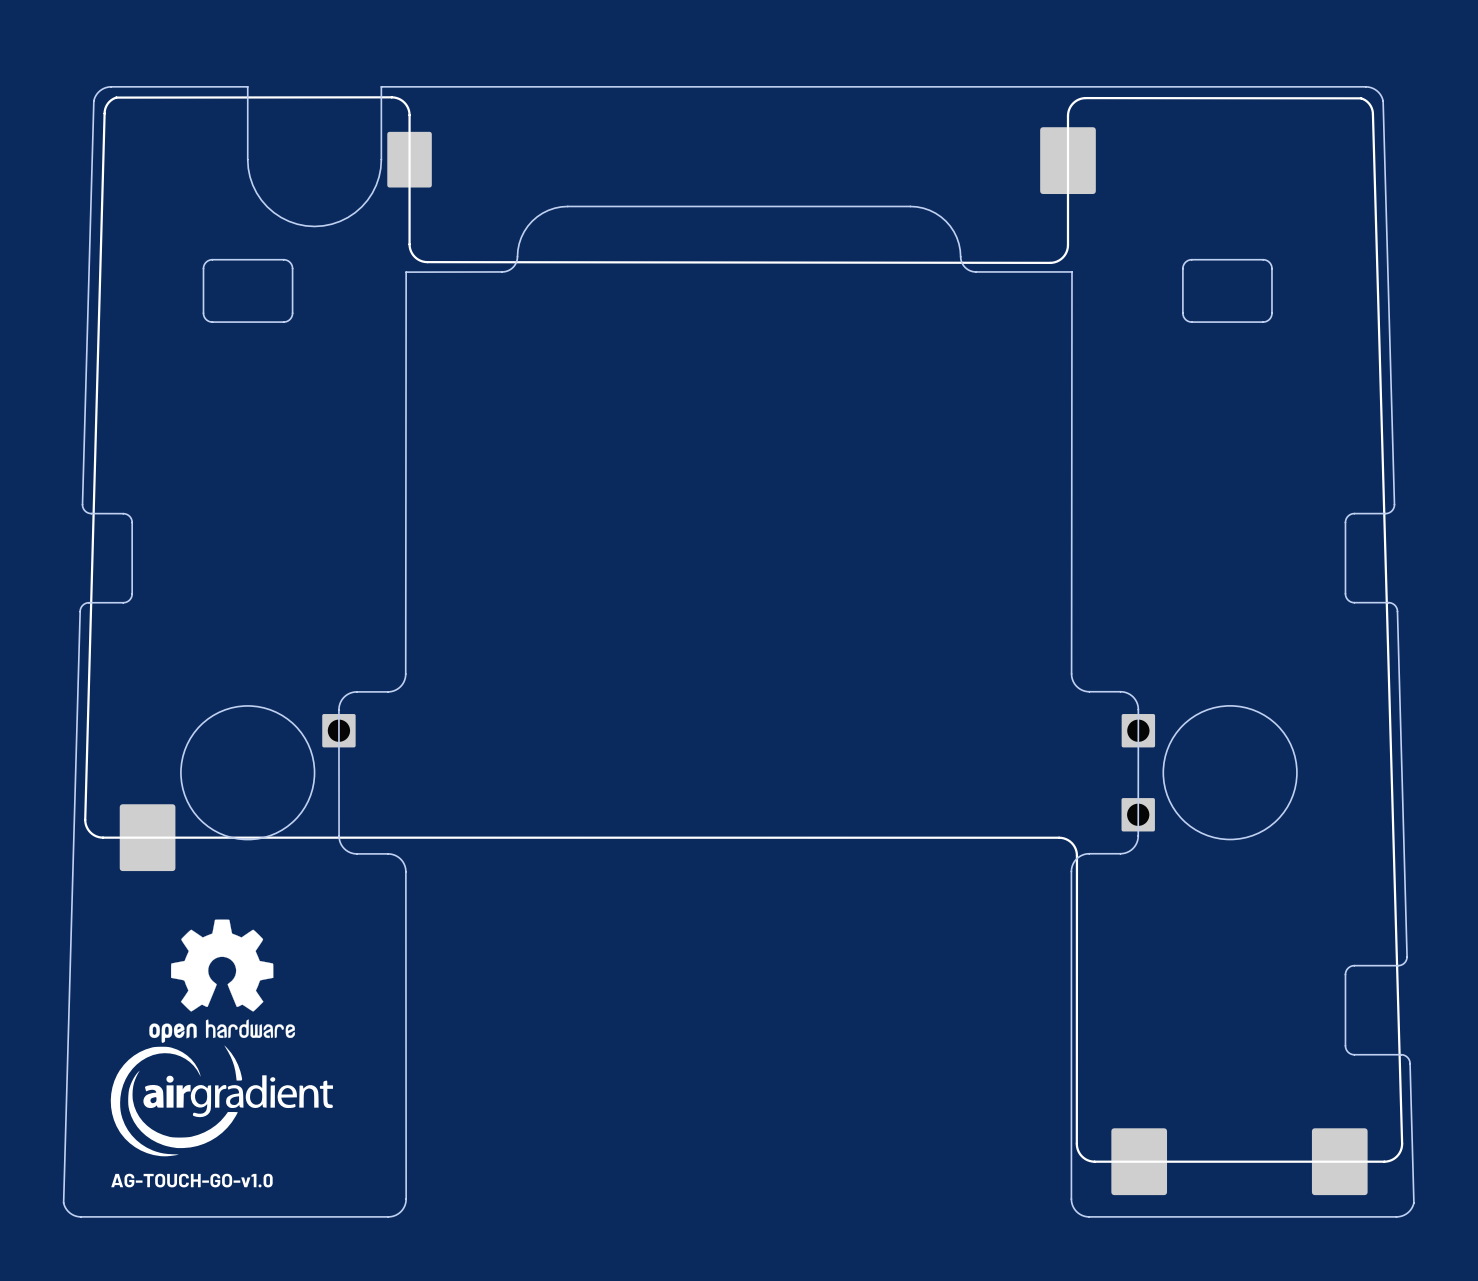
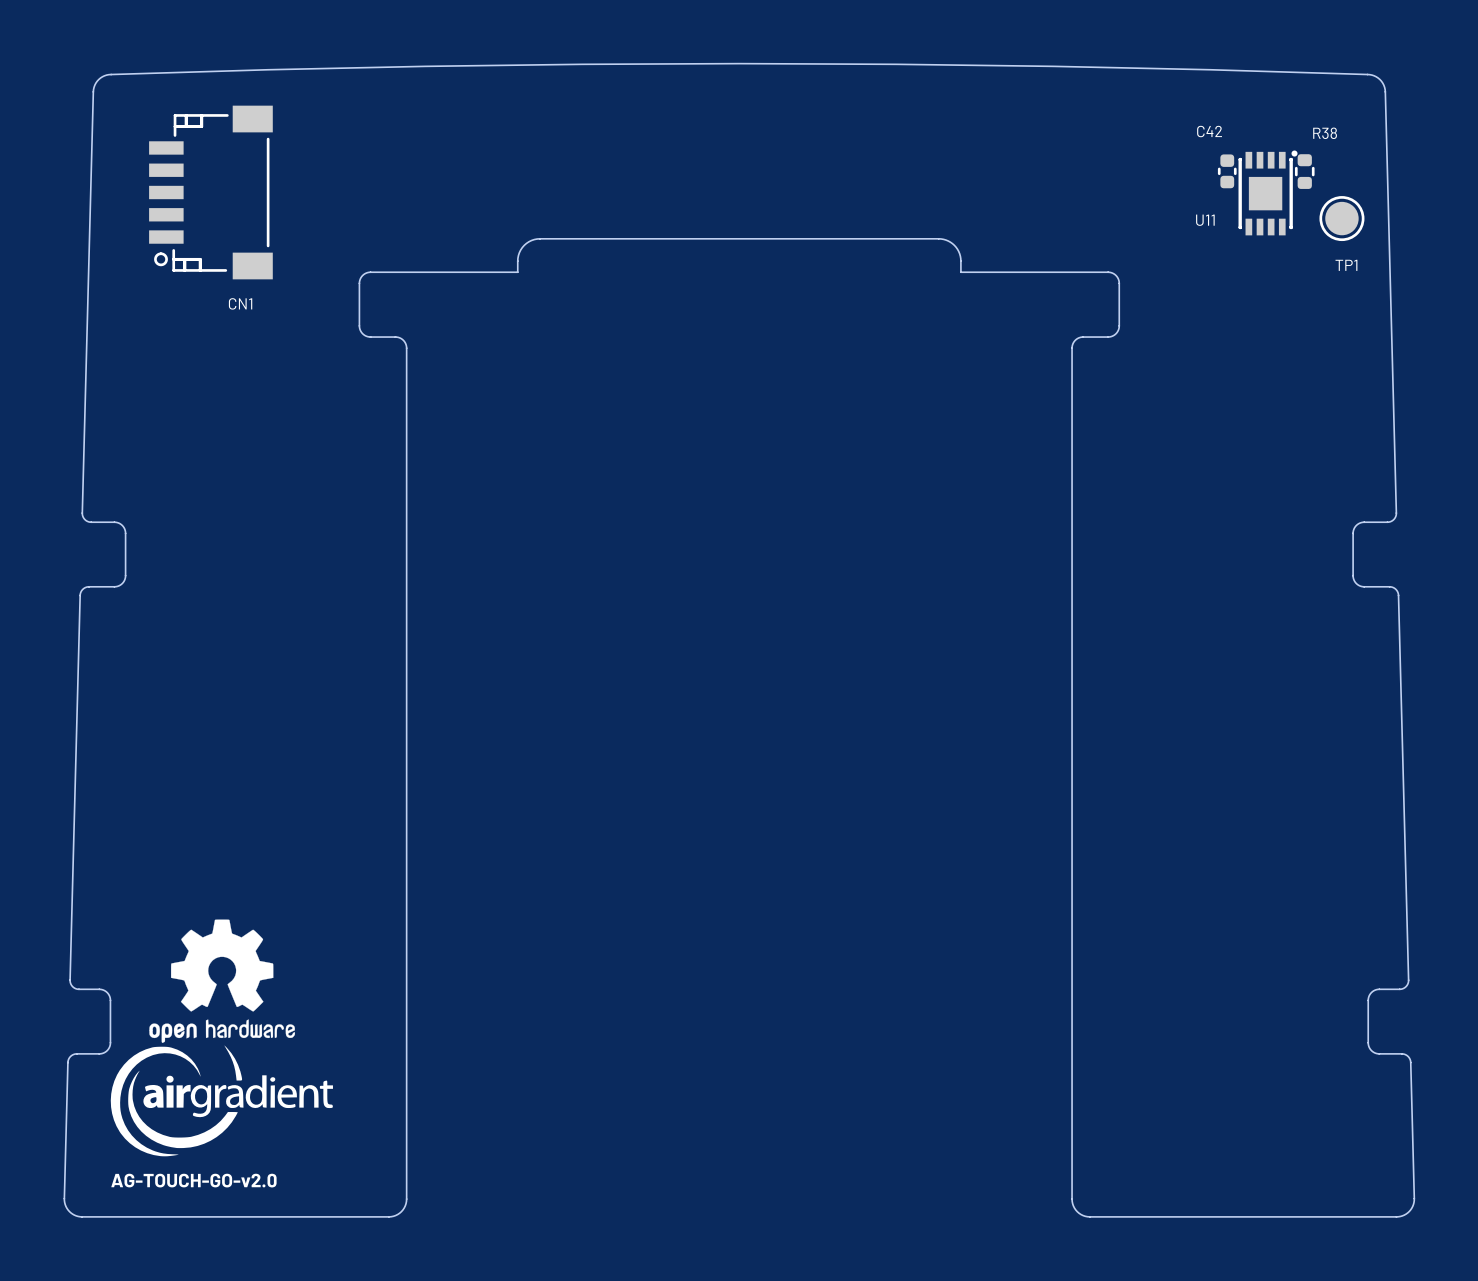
line: (391, 97) (116, 97) (110, 100) (105, 107) (85, 819) (90, 832) (103, 837) (1063, 838) (1073, 844) (1076, 855) (1076, 1143) (1082, 1156) (1094, 1161) (1384, 1161) (1396, 1156) (1402, 1143) (1372, 114) (1368, 102) (1361, 98) (1085, 98) (1076, 100) (1070, 106) (1067, 115) (1067, 247) (1062, 257) (1052, 262) (427, 262) (414, 256) (409, 246) (408, 110) (402, 101) (391, 97) -> none
part: (409, 159) -> none
part: (1067, 160) -> none
C42: none -> (1227, 171)
R38: none -> (1304, 171)
CN1: none -> (210, 192)
U11: none -> (1268, 192)
TP1: none -> (1341, 218)
board edge: (283, 259) (212, 259) (206, 261) (203, 268) (203, 313) (205, 318) (212, 322) (283, 322) (289, 320) (292, 313) (292, 267) (289, 262) (283, 259) -> none
board edge: (1263, 259) (1191, 259) (1186, 261) (1182, 268) (1182, 313) (1184, 318) (1191, 322) (1263, 322) (1268, 320) (1271, 314) (1271, 267) (1268, 261) (1263, 259) -> none
round board edge: [180, 705, 316, 841] -> none
round board edge: [1162, 705, 1298, 841] -> none
part: (338, 730) -> none
part: (1138, 730) -> none
part: (1138, 814) -> none
part: (147, 837) -> none
part: (1139, 1161) -> none
part: (1339, 1161) -> none
text: AG-TOUCH-GO-v1.0 (191, 1180) -> AG-TOUCH-GO-v2.0 (193, 1180)
board edge: (1089, 1216) (1076, 1211) (1071, 1199) (1071, 869) (1075, 860) (1083, 854) (1125, 853) (1133, 848) (1136, 842) (1138, 709) (1135, 700) (1128, 693) (1083, 690) (1075, 685) (1071, 675) (1072, 271) (970, 270) (961, 262) (956, 237) (945, 221) (929, 210) (910, 206) (561, 206) (542, 213) (527, 226) (519, 243) (516, 262) (507, 270) (406, 272) (405, 676) (401, 685) (393, 690) (349, 693) (341, 700) (338, 709) (340, 842) (346, 850) (352, 853) (393, 854) (401, 860) (405, 869) (406, 1199) (400, 1211) (388, 1216) -> (1089, 1216) (1077, 1211) (1072, 1199) (1072, 348) (1073, 342) (1078, 337) (1109, 336) (1117, 331) (1117, 277) (1108, 272) (960, 272) (960, 258) (957, 249) (950, 242) (941, 238) (540, 238) (528, 241) (520, 249) (517, 258) (517, 272) (370, 272) (362, 275) (359, 281) (359, 325) (361, 332) (369, 336) (399, 337) (405, 342) (406, 348) (406, 1199) (401, 1211) (388, 1216)
board edge: (1396, 1216) (1407, 1212) (1413, 1202) (1409, 1060) (1402, 1054) (1352, 1054) (1347, 1051) (1345, 1045) (1346, 969) (1353, 965) (1400, 965) (1405, 962) (1407, 956) (1397, 610) (1394, 605) (1390, 602) (1351, 602) (1346, 598) (1345, 593) (1346, 518) (1353, 513) (1388, 513) (1393, 509) (1394, 504) (1383, 100) (1376, 90) (1365, 86) (381, 86) (381, 159) (376, 185) (367, 200) (347, 217) (331, 224) (314, 226) (297, 224) (281, 217) (261, 200) (252, 185) (247, 159) (247, 86) (111, 86) (100, 90) (93, 100) (82, 505) (85, 510) (89, 513) (124, 513) (130, 518) (132, 593) (130, 599) (126, 602) (87, 602) (82, 605) (80, 610) (63, 1202) (69, 1212) (82, 1216) -> (1396, 1216) (1407, 1212) (1414, 1200) (1410, 1061) (1404, 1054) (1378, 1053) (1369, 1048) (1368, 1000) (1370, 993) (1375, 990) (1401, 989) (1406, 985) (1408, 981) (1398, 595) (1396, 590) (1391, 587) (1359, 585) (1354, 581) (1353, 575) (1353, 533) (1355, 526) (1362, 522) (1390, 521) (1396, 514) (1385, 91) (1382, 83) (1376, 76) (1367, 74) (1053, 66) (739, 63) (425, 66) (111, 74) (102, 76) (95, 83) (93, 91) (82, 514) (88, 521) (115, 522) (123, 526) (125, 533) (125, 575) (123, 581) (119, 585) (86, 587) (82, 590) (80, 595) (70, 981) (72, 986) (76, 989) (103, 990) (108, 993) (110, 1000) (108, 1048) (100, 1053) (74, 1054) (68, 1061) (64, 1200) (70, 1212) (82, 1216)

